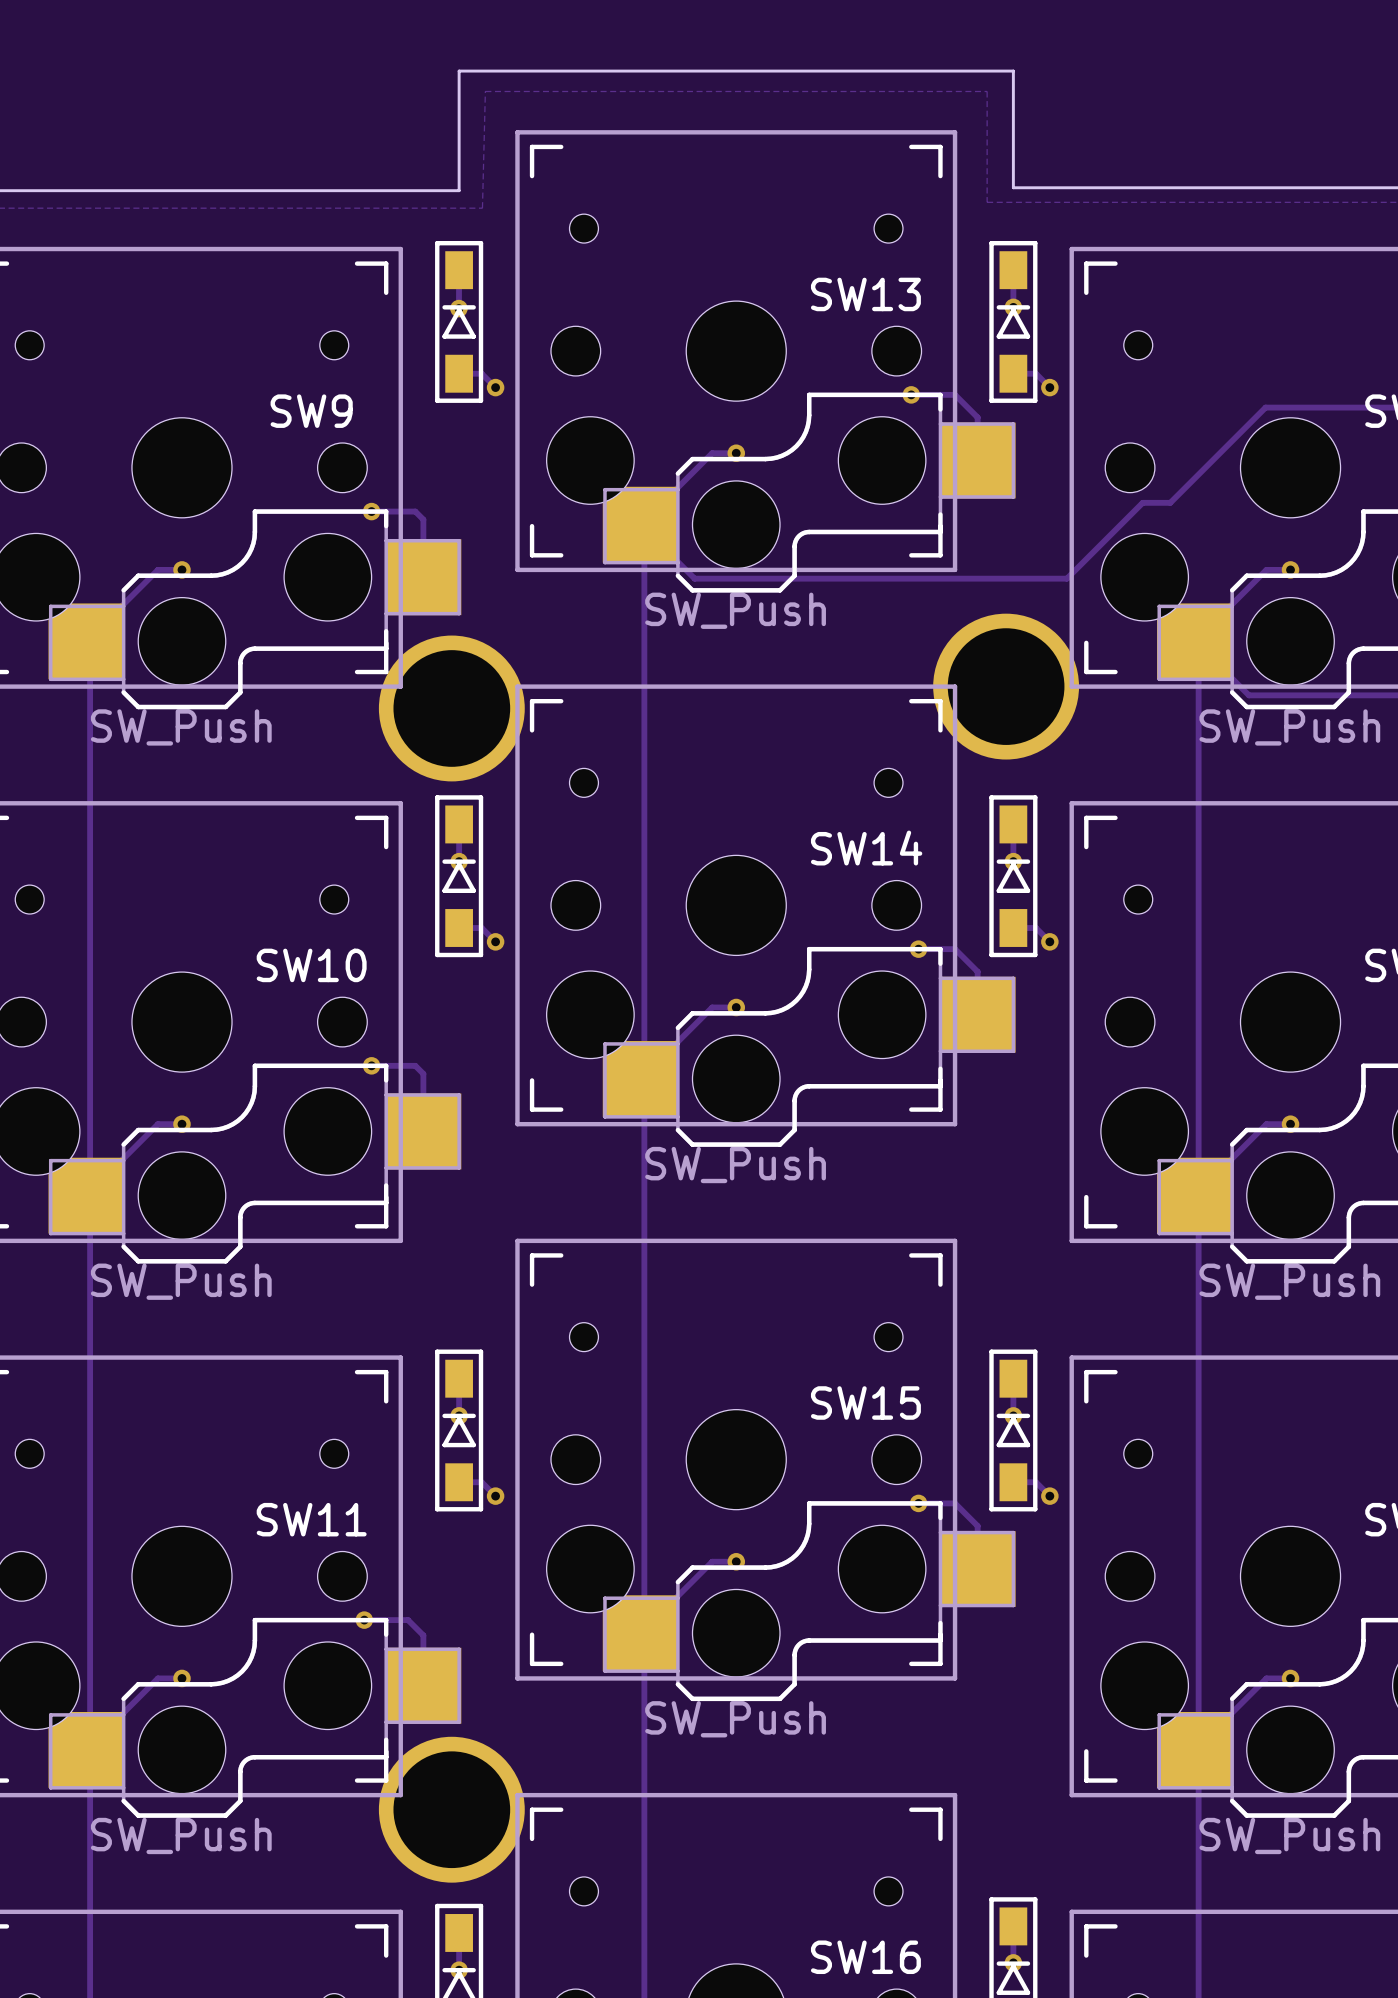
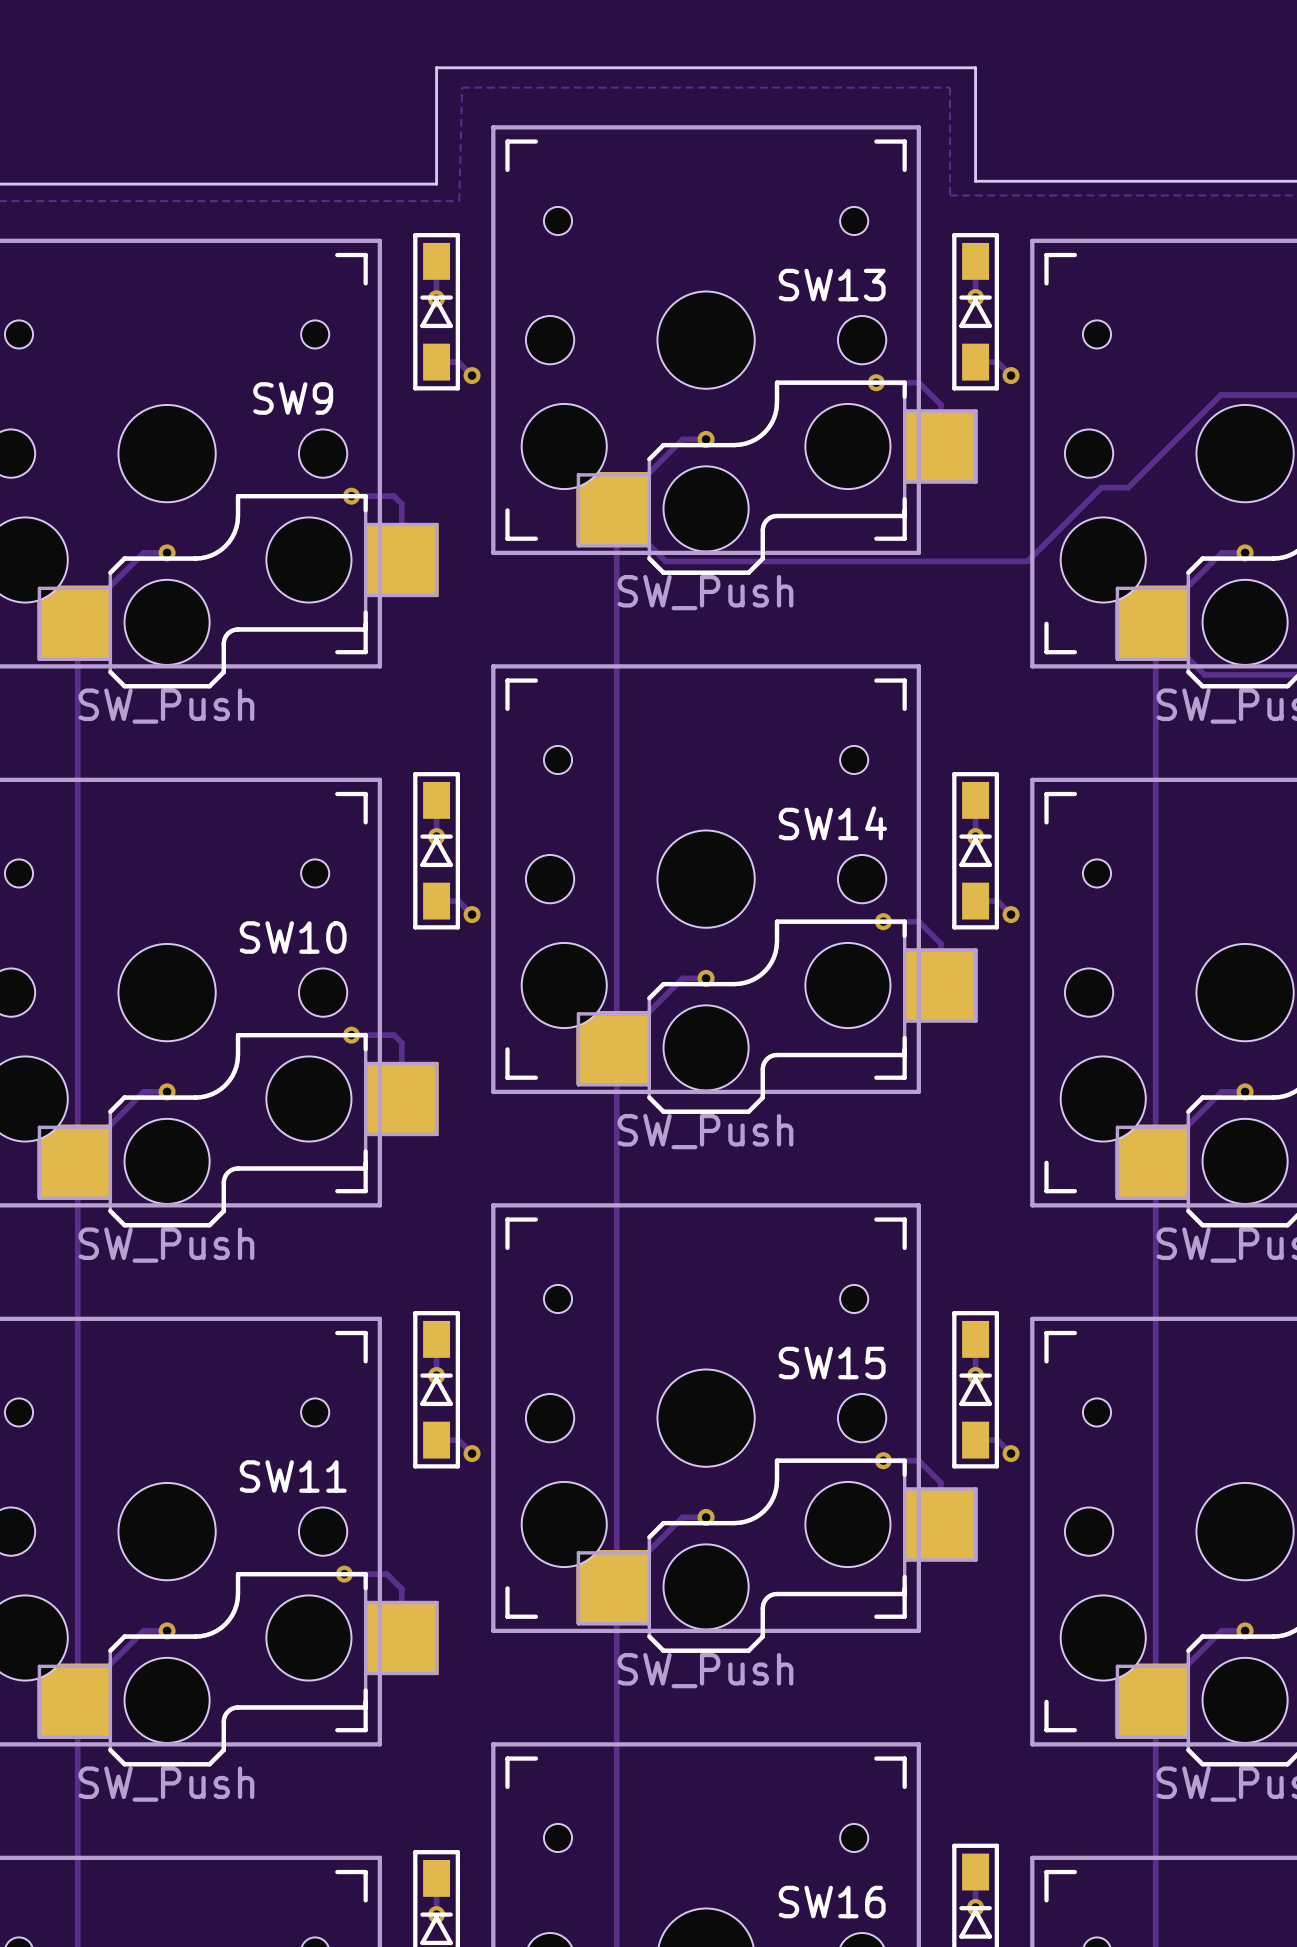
part: (1006, 686) -> none
part: (451, 708) -> none
part: (451, 1809) -> none

